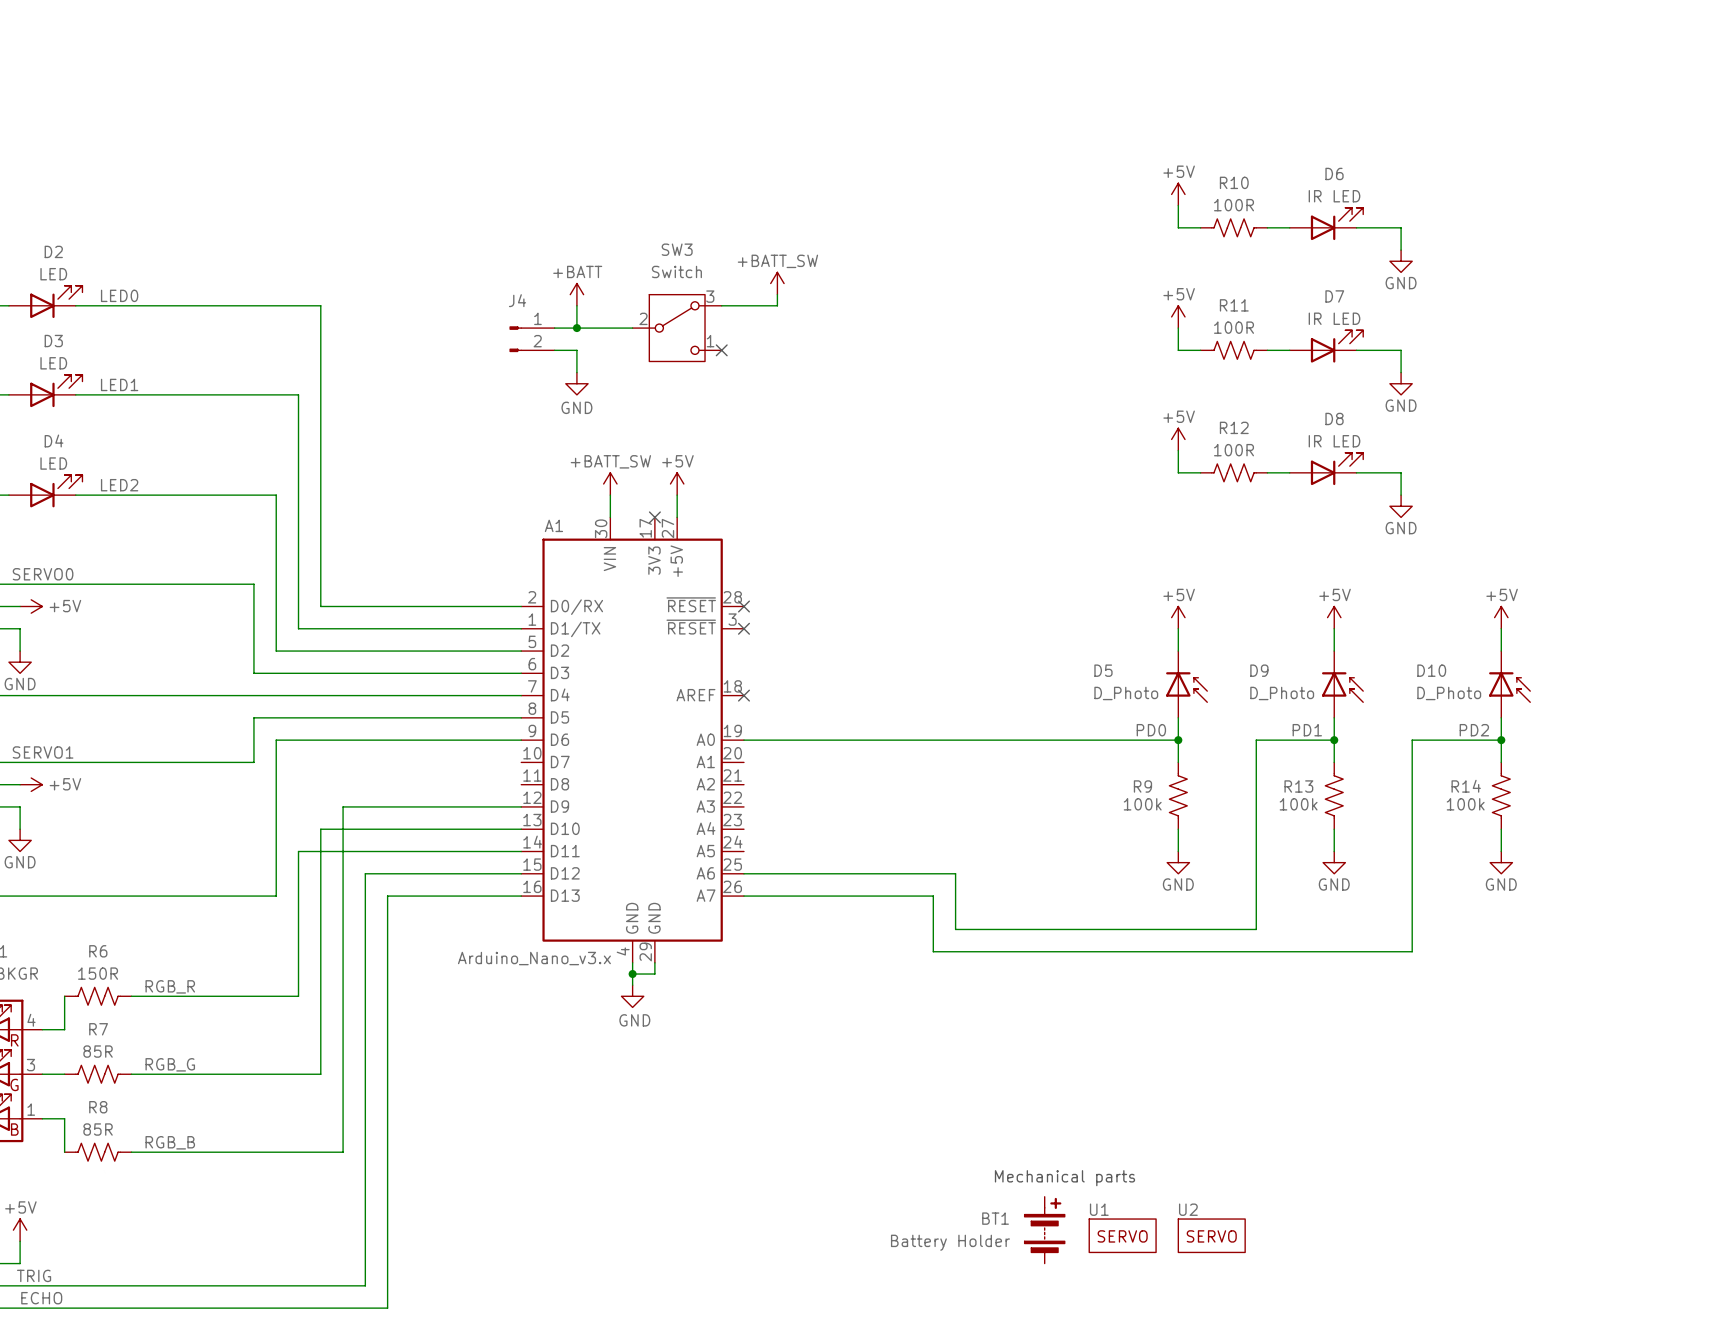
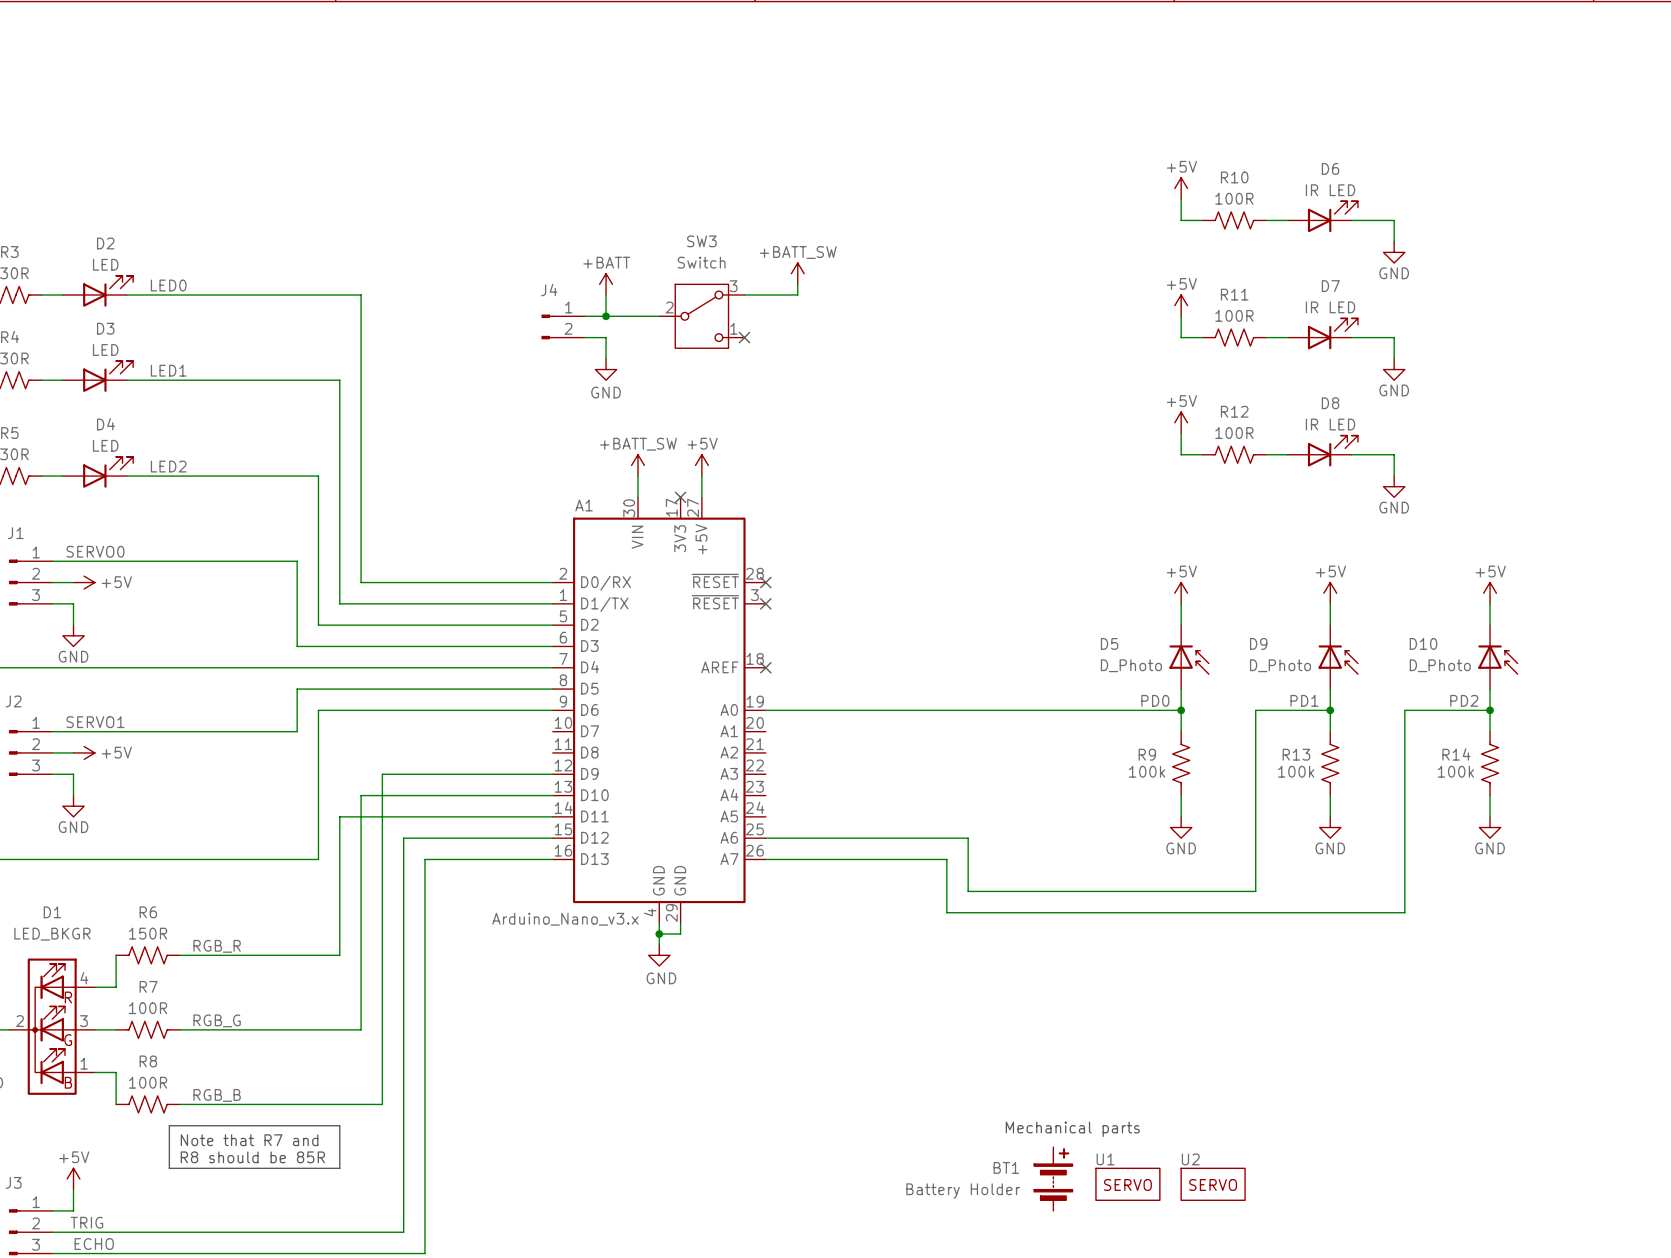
R7 value: 85R (98, 1051) -> 100R (148, 1008)
R8 value: 85R (98, 1129) -> 100R (148, 1082)
line: none -> (169, 1125) (339, 1125) (339, 1168) (169, 1168) (169, 1125)
text: none -> Note that R7 and (249, 1140)
text: none -> R8 should be 85R (252, 1157)

